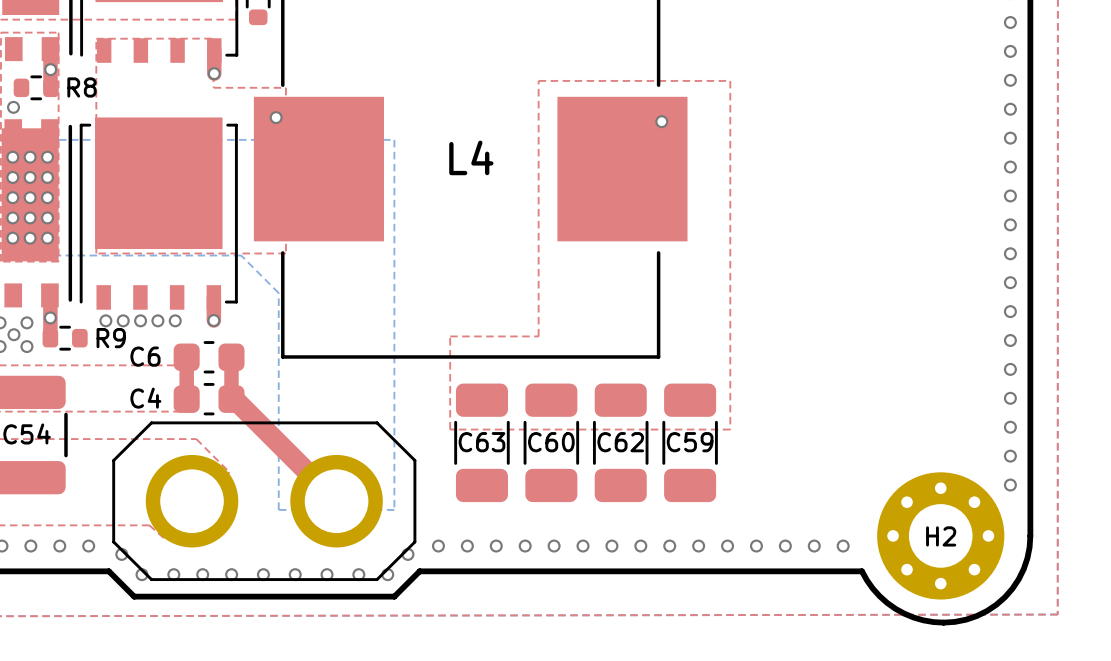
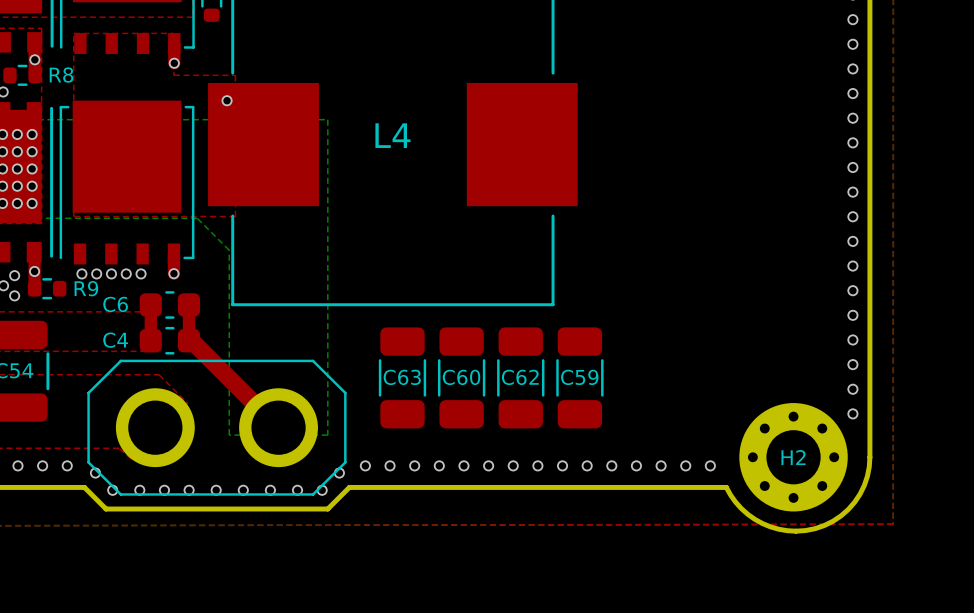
top zone outline: (538, 80) (538, 336) (450, 336) (450, 429) (730, 429) (730, 80) (538, 80) -> none
via: (661, 121) -> none

